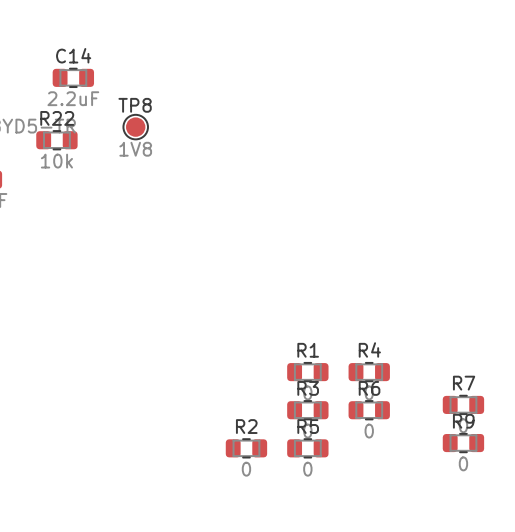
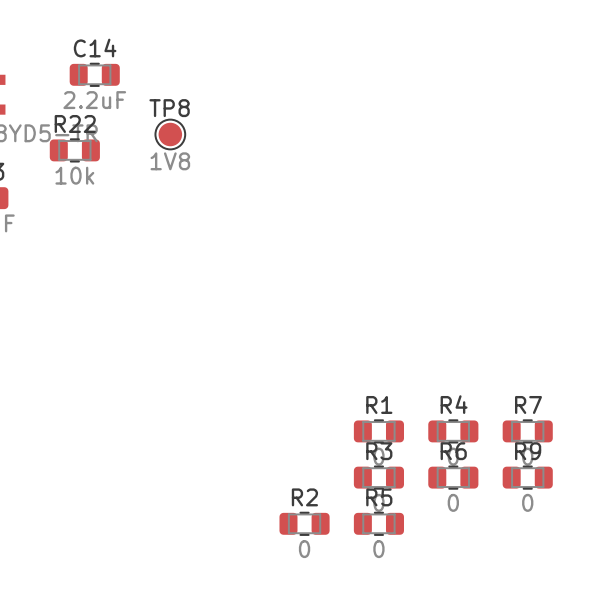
R7 position: (463, 404) -> (527, 431)
R9 position: (463, 443) -> (527, 477)

